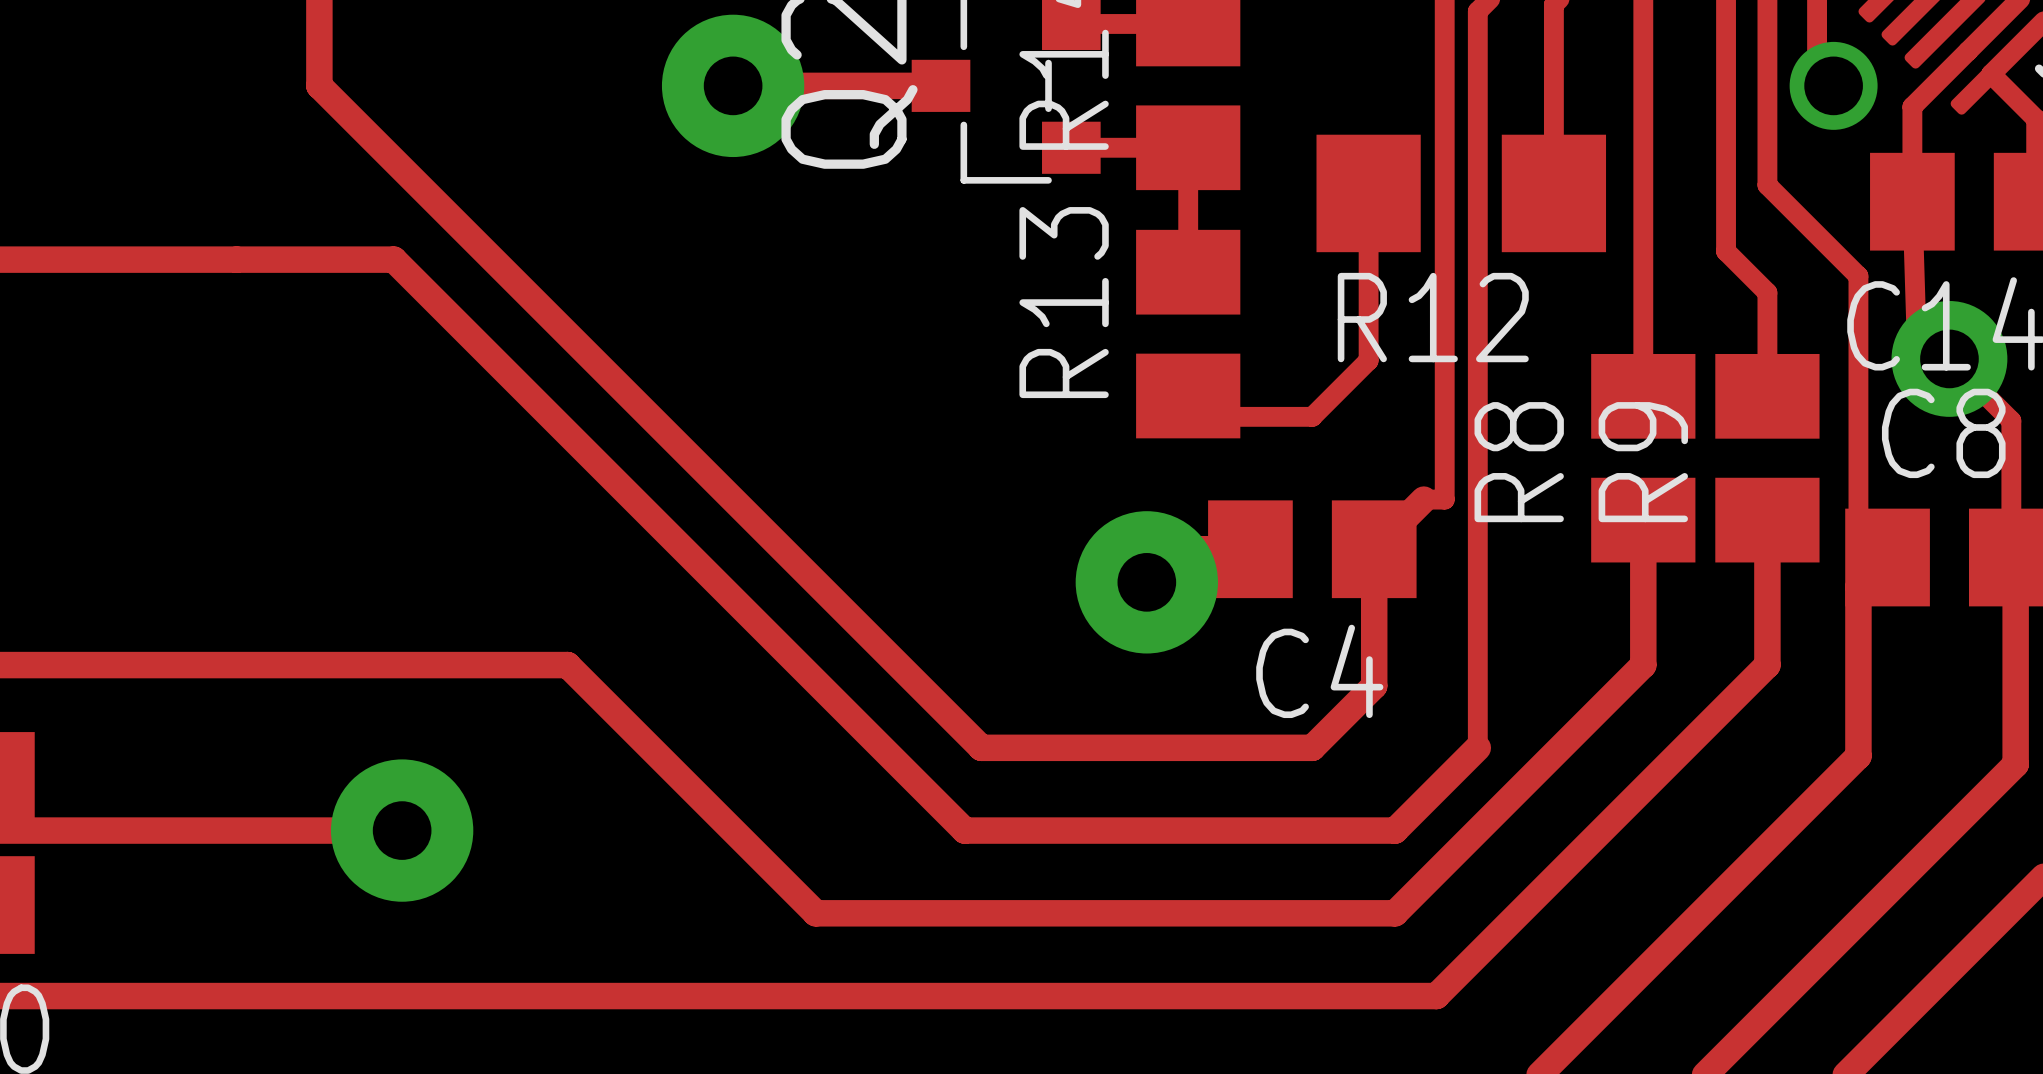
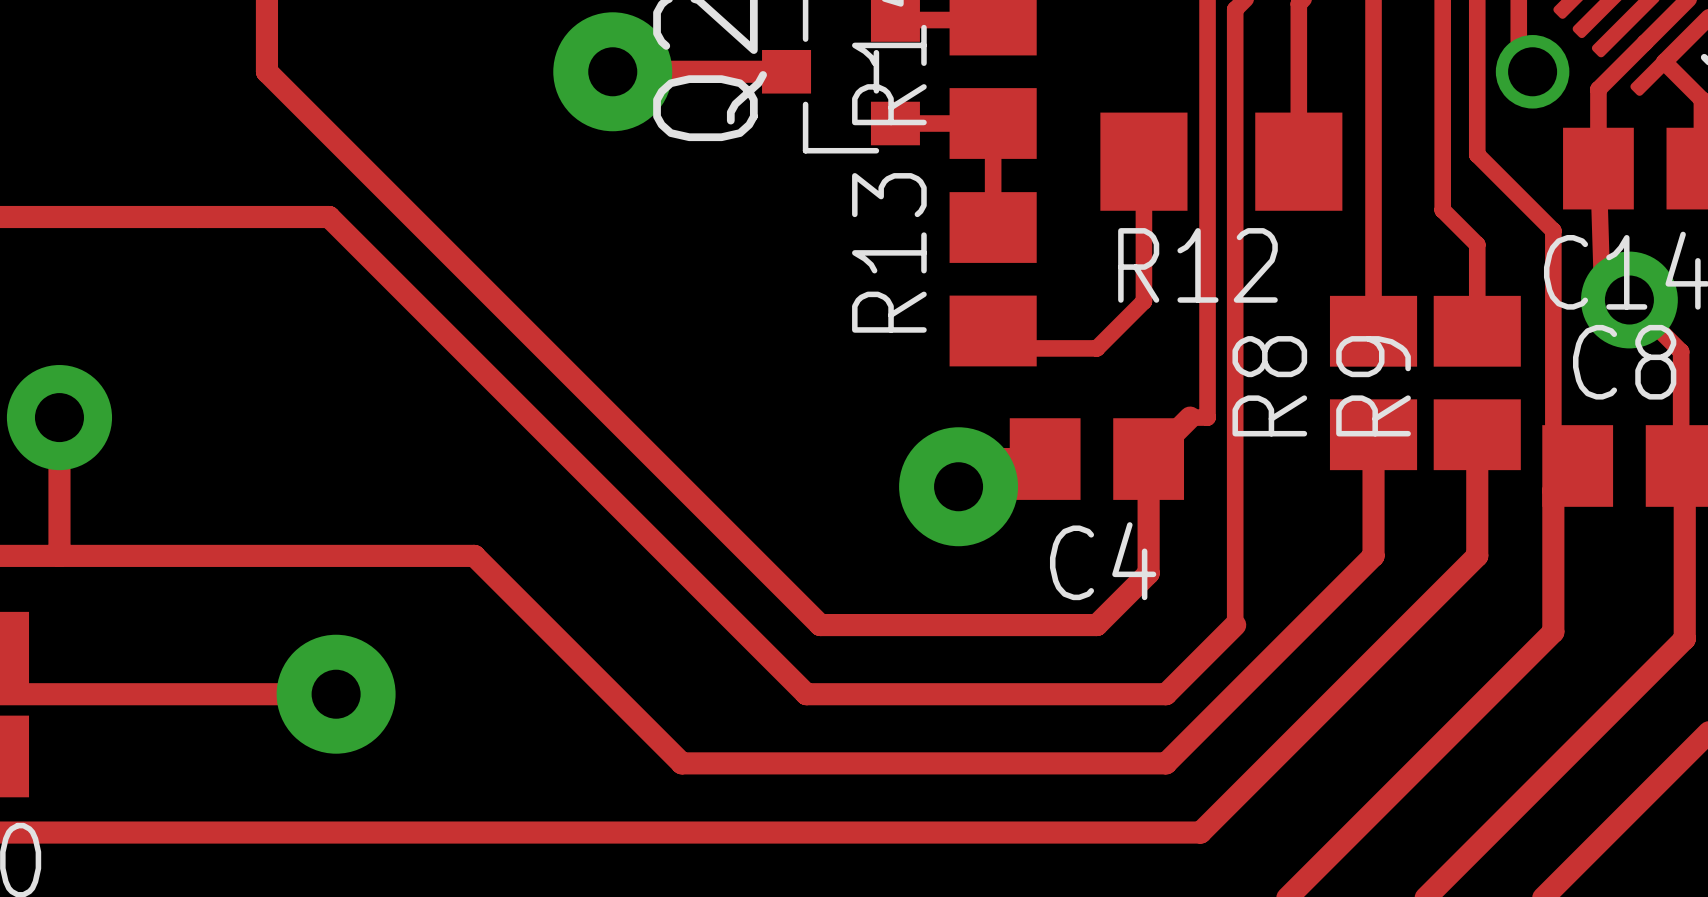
track: none -> (59, 417) (59, 555)
via: none -> (59, 417)

